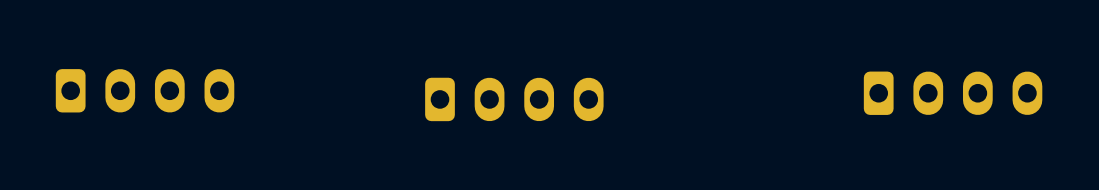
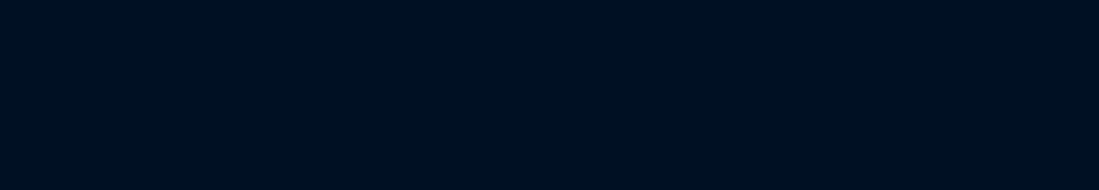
part: (145, 90) -> none
part: (953, 93) -> none
part: (514, 99) -> none

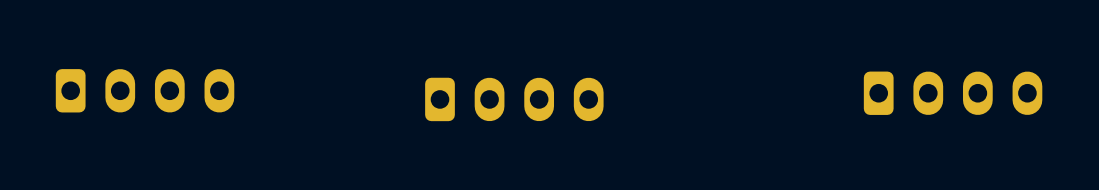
part: none -> (145, 90)
part: none -> (953, 93)
part: none -> (514, 99)

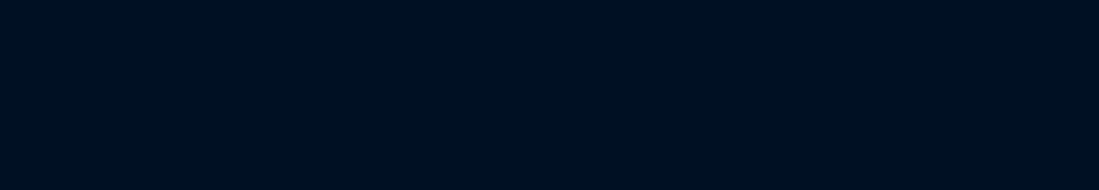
part: (145, 90) -> none
part: (953, 93) -> none
part: (514, 99) -> none

